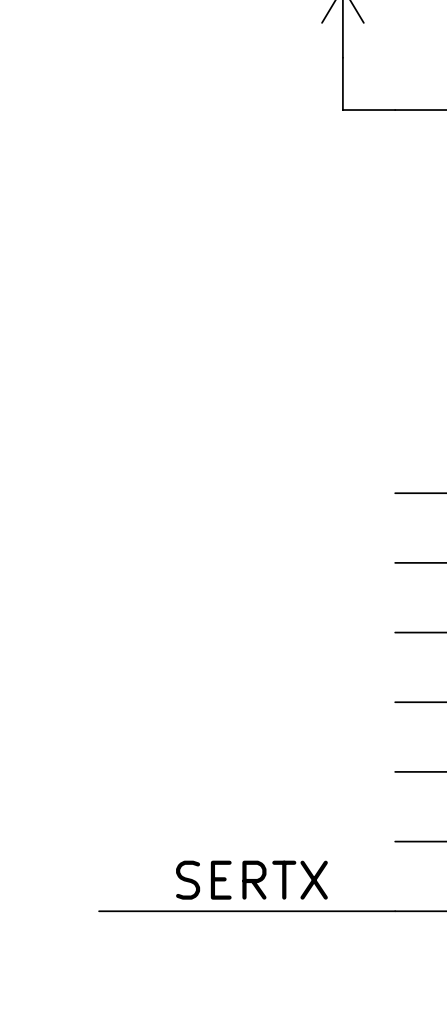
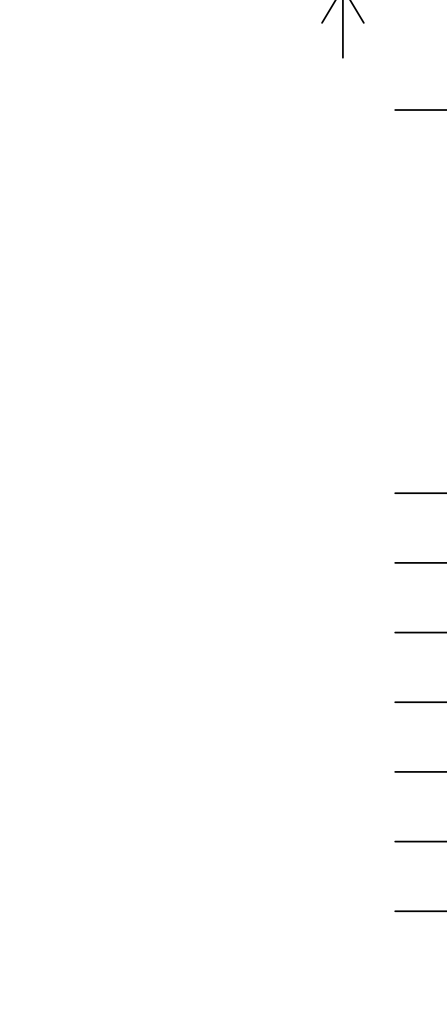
wire: (342, 57) (342, 110) (395, 110) -> none
label: SERTX (251, 880) -> none
wire: (99, 911) (395, 911) -> none

